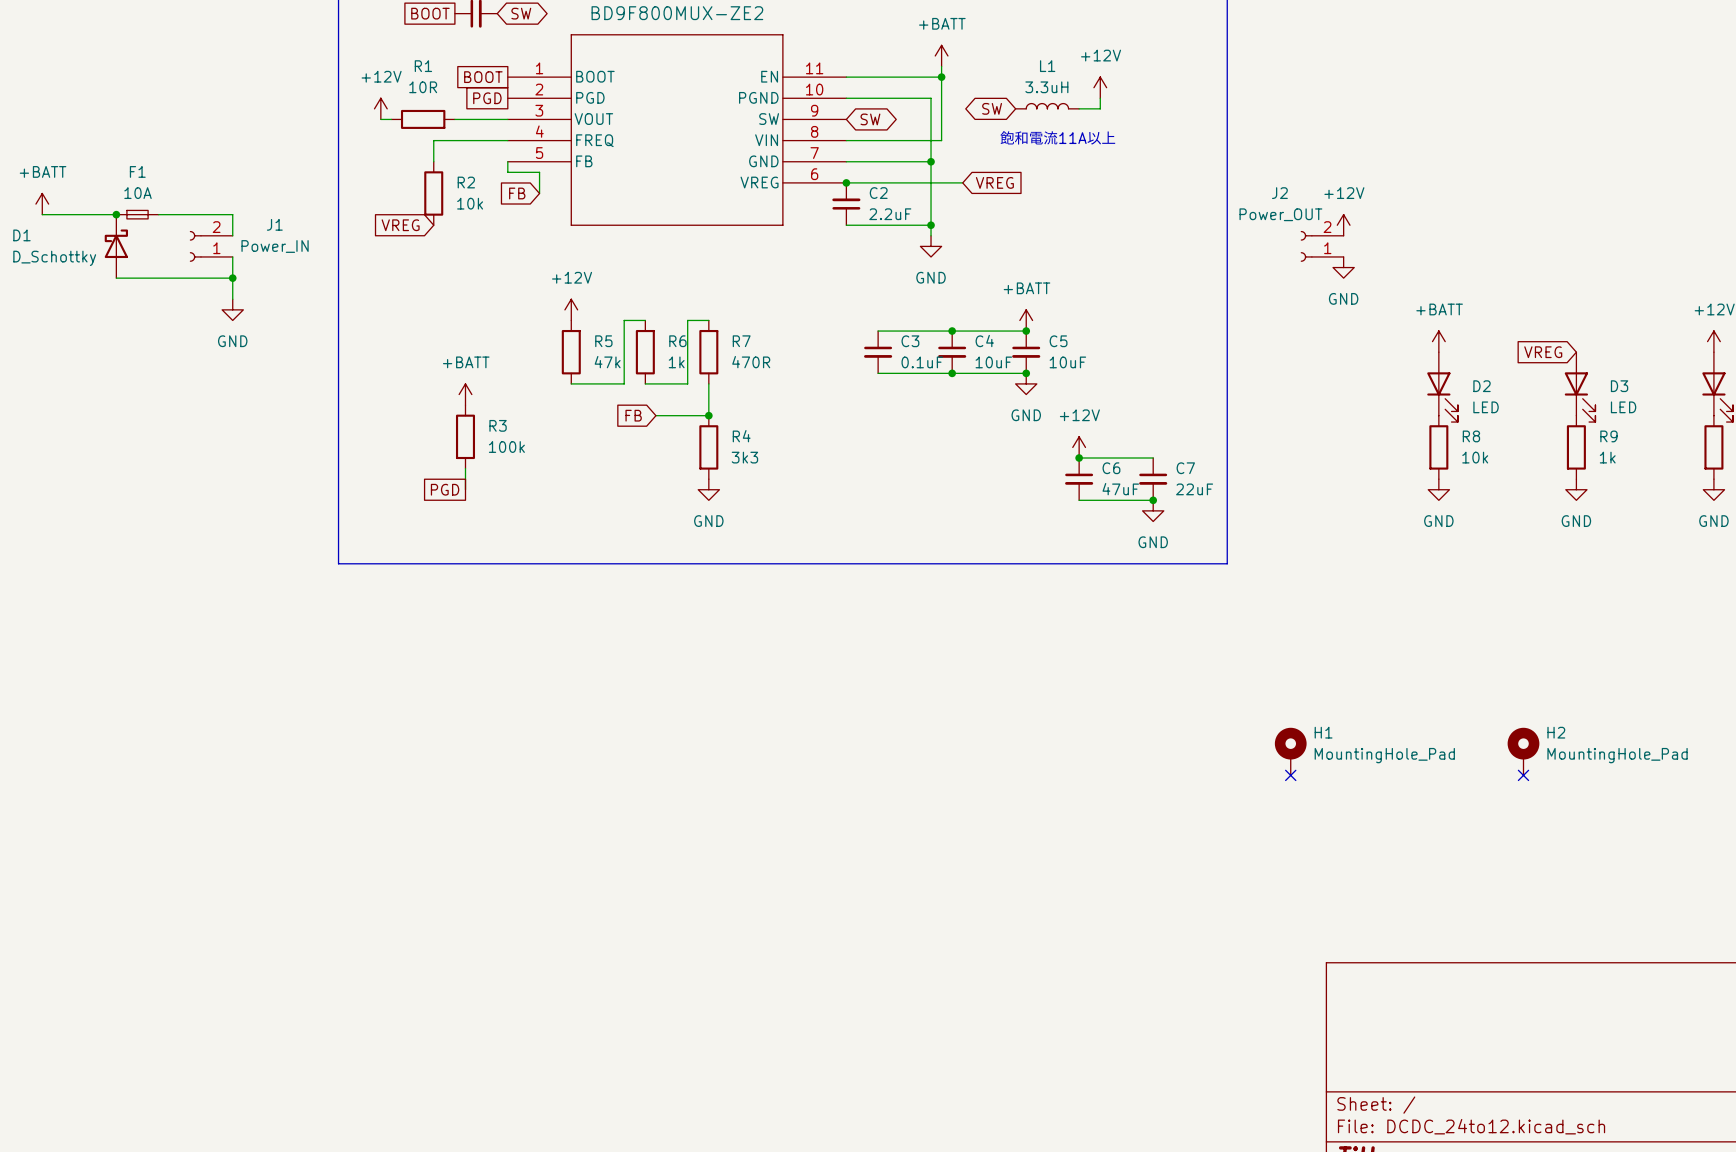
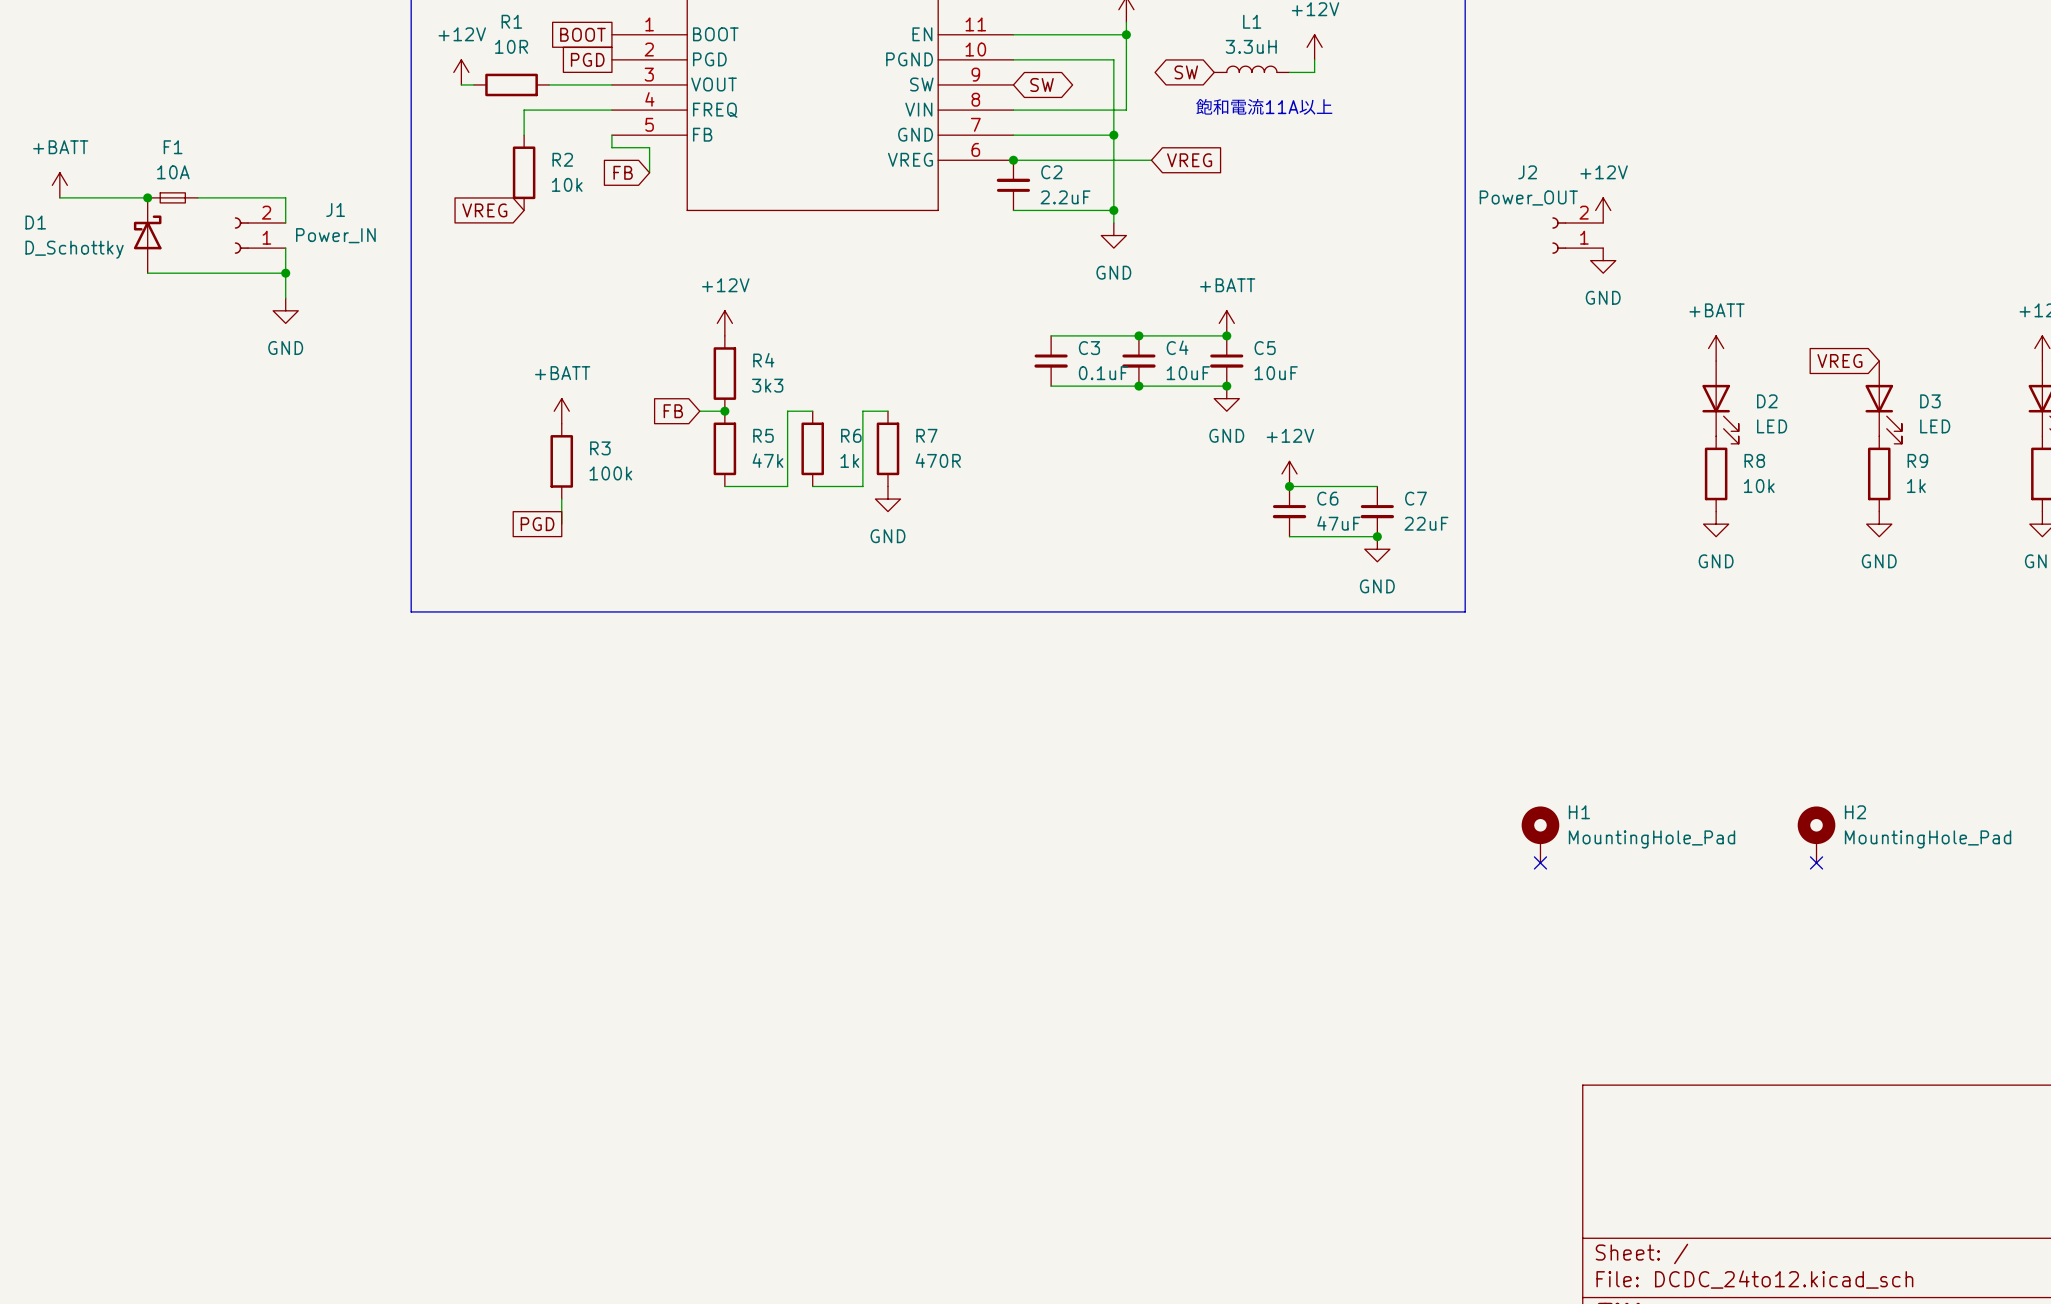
power symbol position: +12V (571, 309) -> +12V (724, 323)
wire: (645, 320) (624, 320) (624, 383) (571, 383) -> (812, 411) (787, 411) (787, 486) (724, 486)
wire: (708, 320) (687, 320) (687, 383) (645, 383) -> (887, 411) (862, 411) (862, 486) (812, 486)
R5 position: (571, 352) -> (724, 448)
R6 position: (645, 352) -> (812, 448)
R7 position: (708, 352) -> (887, 448)
wire: (708, 383) (708, 415) (655, 415) -> none
wire: none -> (699, 411) (724, 411)
junction: none -> (724, 411)
global label position: FB (633, 415) -> FB (673, 411)
junction: (708, 415) -> none
R4 position: (708, 447) -> (724, 373)
power symbol position: GND (708, 489) -> GND (887, 499)

